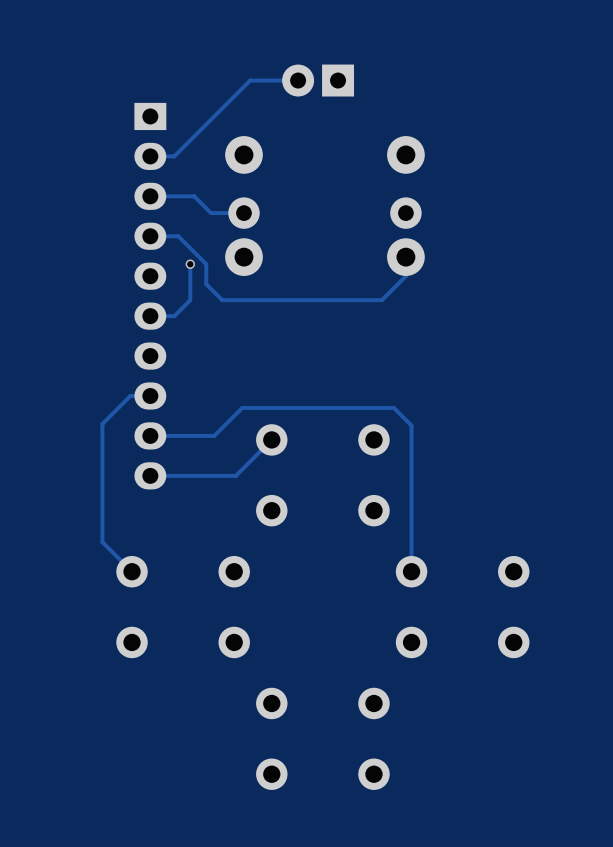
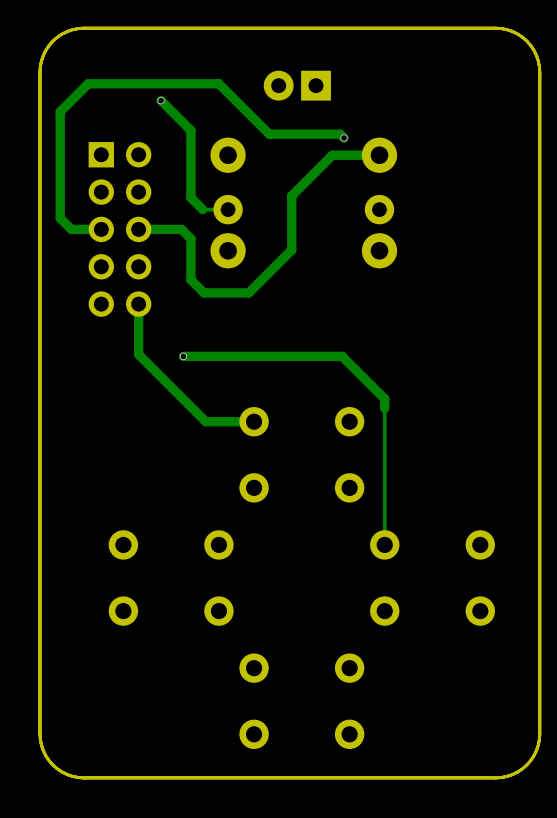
board edge: none -> (84, 28) (67, 31) (52, 41) (43, 55) (39, 72)
board edge: none -> (84, 28) (67, 31) (52, 41) (43, 55) (39, 72)
board edge: none -> (495, 28) (84, 28)
board edge: none -> (495, 28) (512, 31) (526, 41) (536, 55) (539, 72)
board edge: none -> (495, 28) (512, 31) (526, 41) (536, 55) (539, 72)
board edge: none -> (39, 72) (39, 733)
board edge: none -> (539, 72) (539, 733)
track: (298, 80) (250, 80) (174, 156) (150, 156) -> none
via: none -> (161, 100)
track: none -> (344, 137) (340, 134) (269, 134) (218, 83) (88, 83) (60, 111) (60, 218) (71, 229) (101, 229)
via: none -> (344, 137)
track: none -> (379, 155) (332, 155) (291, 195) (291, 249) (248, 292) (204, 292) (190, 279) (190, 238) (181, 229) (138, 229)
track: (150, 196) (194, 196) (211, 213) (217, 213) -> (161, 100) (190, 130) (190, 197) (202, 209)
part: none -> (119, 229)
track: (150, 236) (178, 236) (206, 264) (206, 284) (222, 300) (381, 300) (405, 276) (405, 257) -> none
track: (190, 264) (190, 300) (174, 316) (150, 316) -> none
via: (190, 264) -> none
part: (150, 296) -> none
via: none -> (183, 356)
track: (150, 396) (130, 396) (102, 423) (102, 542) (132, 571) -> none
track: (411, 425) (393, 407) (242, 407) (214, 435) (150, 435) -> (384, 408) (384, 398) (342, 356) (183, 356)
track: (271, 439) (235, 475) (150, 475) -> (254, 421) (205, 421) (138, 354) (138, 304)
board edge: none -> (39, 733) (43, 750) (52, 764) (67, 774) (84, 777)
board edge: none -> (39, 733) (43, 750) (52, 764) (67, 774) (84, 777)
board edge: none -> (539, 733) (536, 750) (526, 764) (512, 774) (495, 777)
board edge: none -> (539, 733) (536, 750) (526, 764) (512, 774) (495, 777)
board edge: none -> (495, 777) (84, 777)

